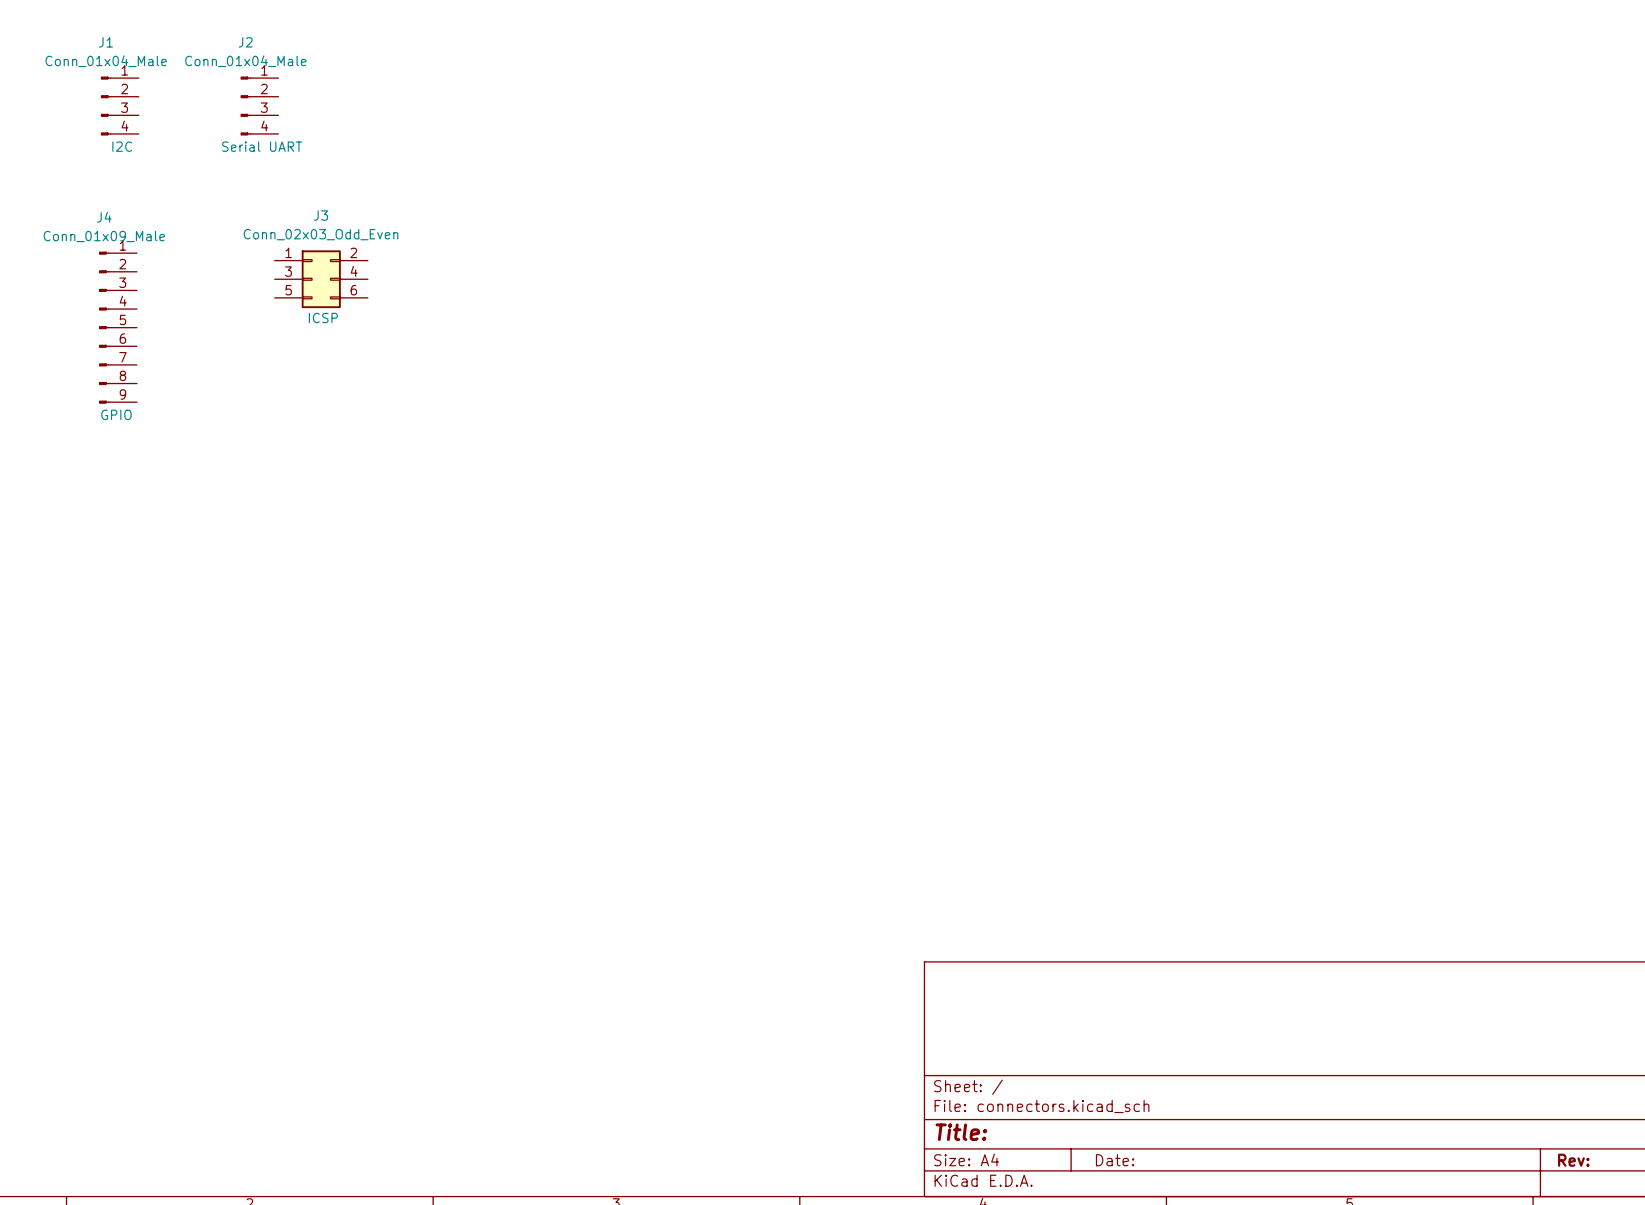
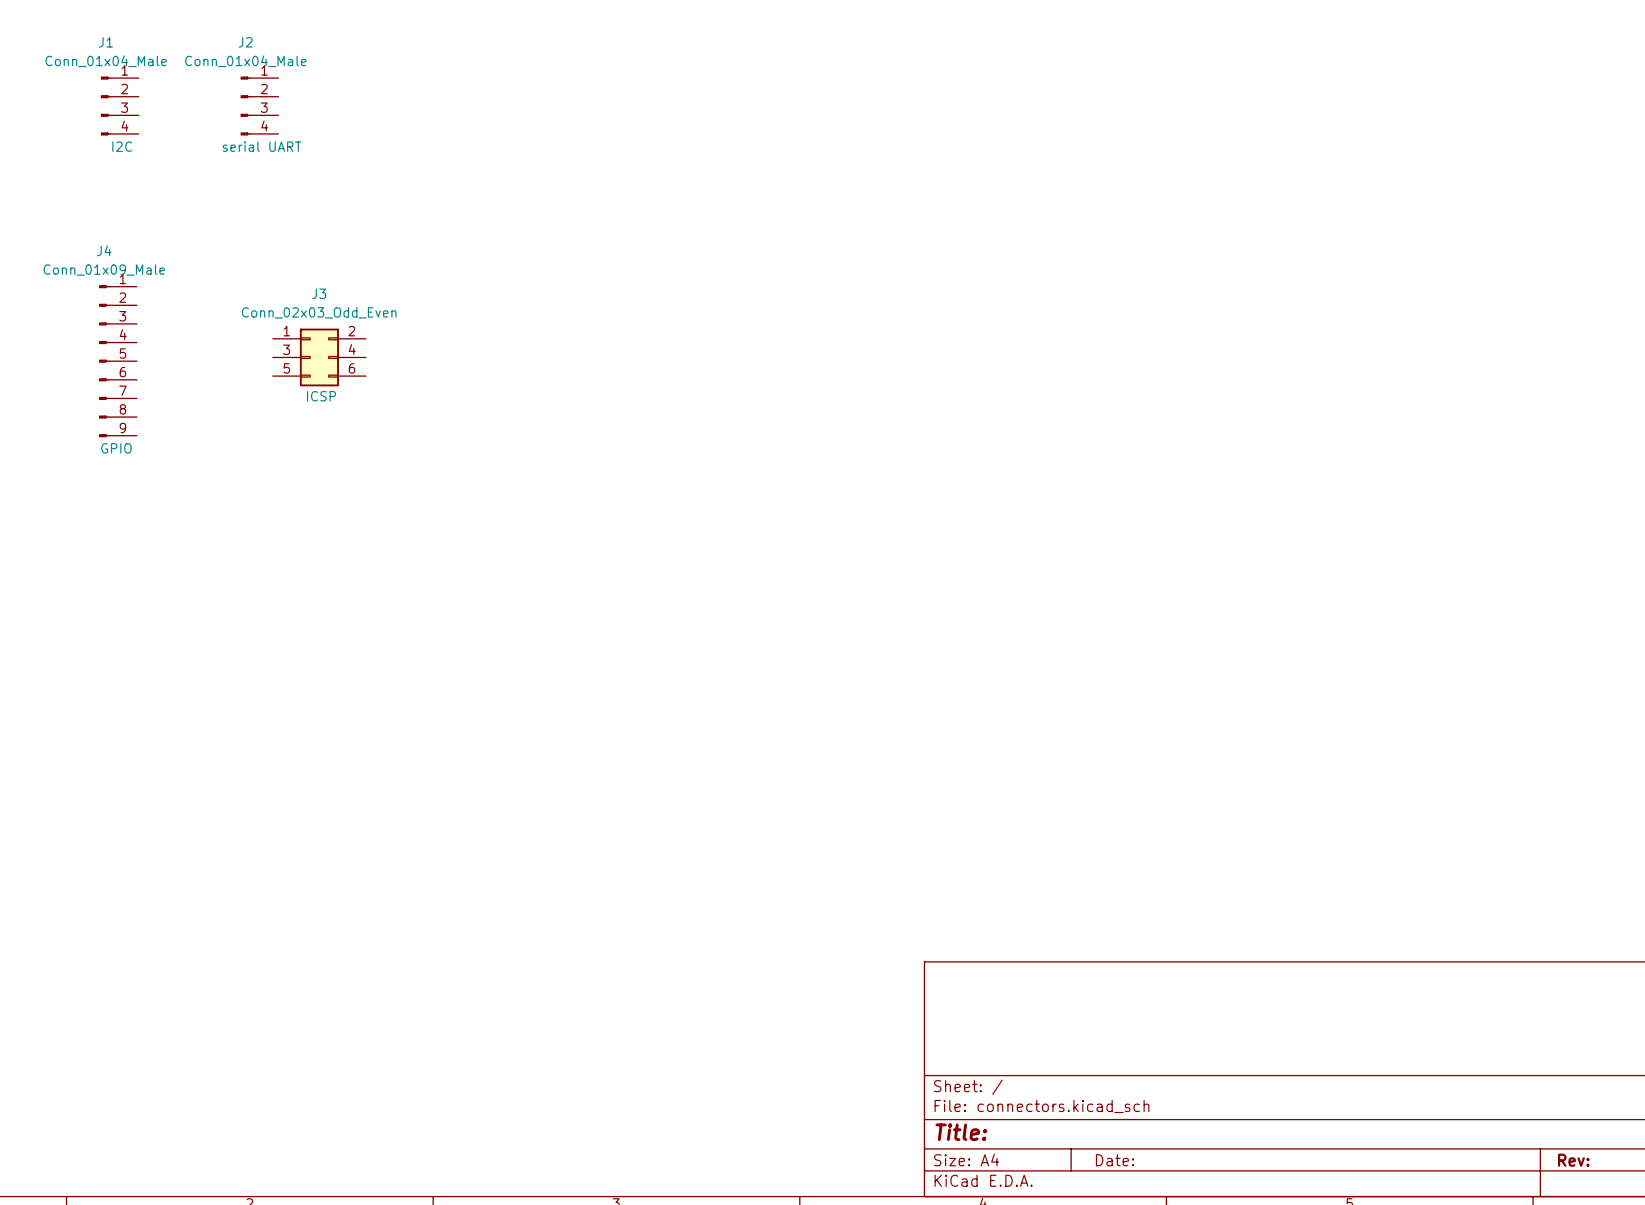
J2 text: Serial UART (262, 146) -> serial UART (262, 146)
J3 position: (321, 279) -> (319, 357)
J4 position: (117, 327) -> (117, 361)

